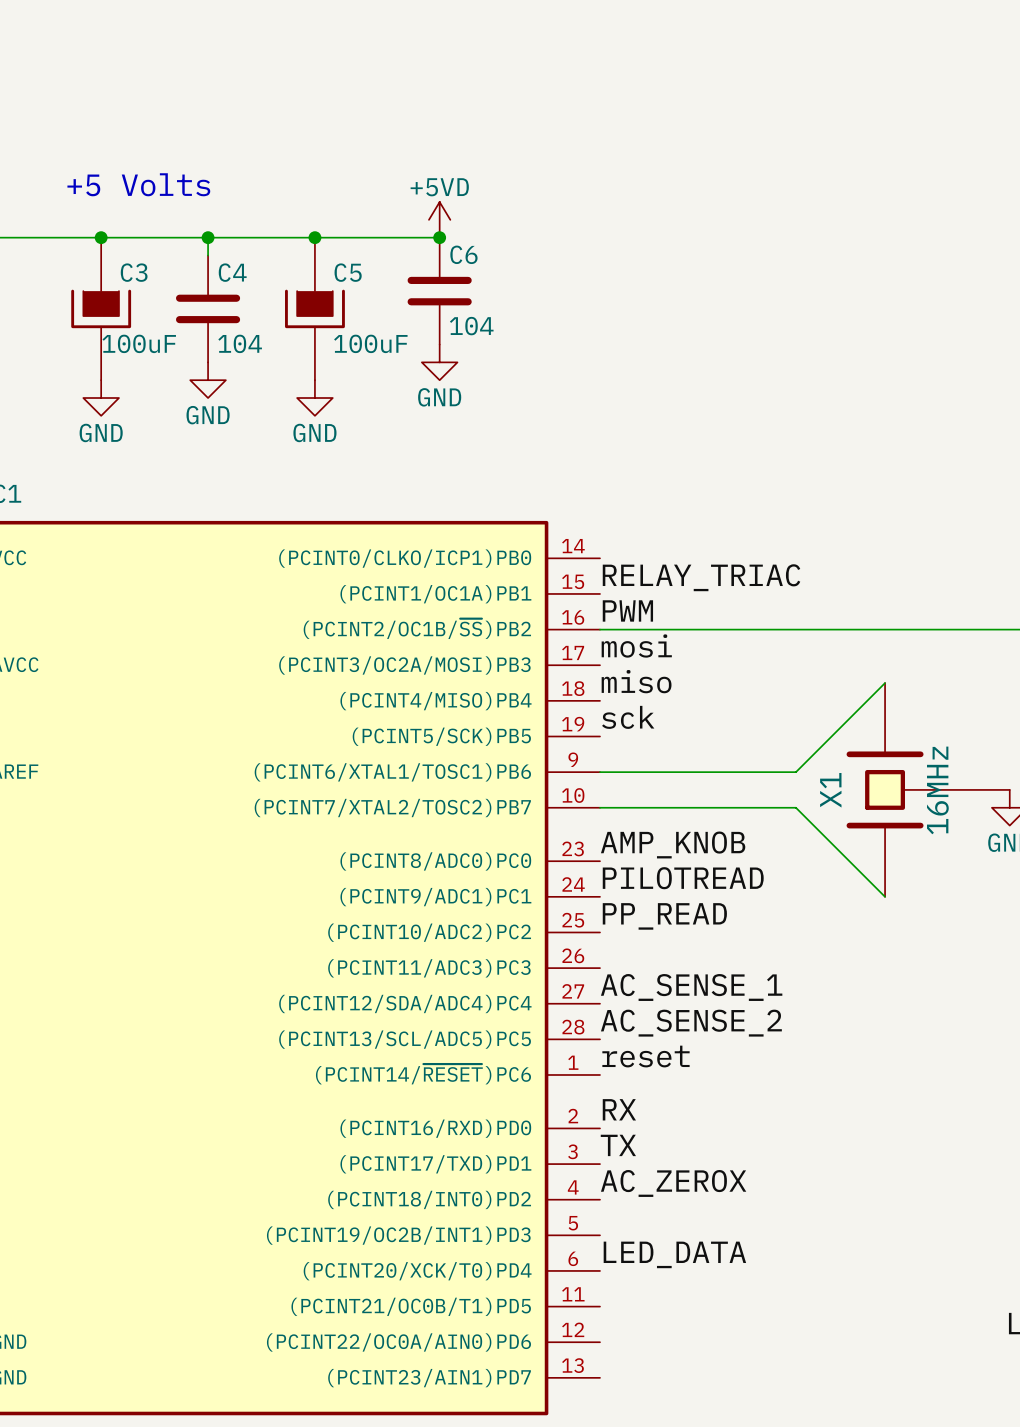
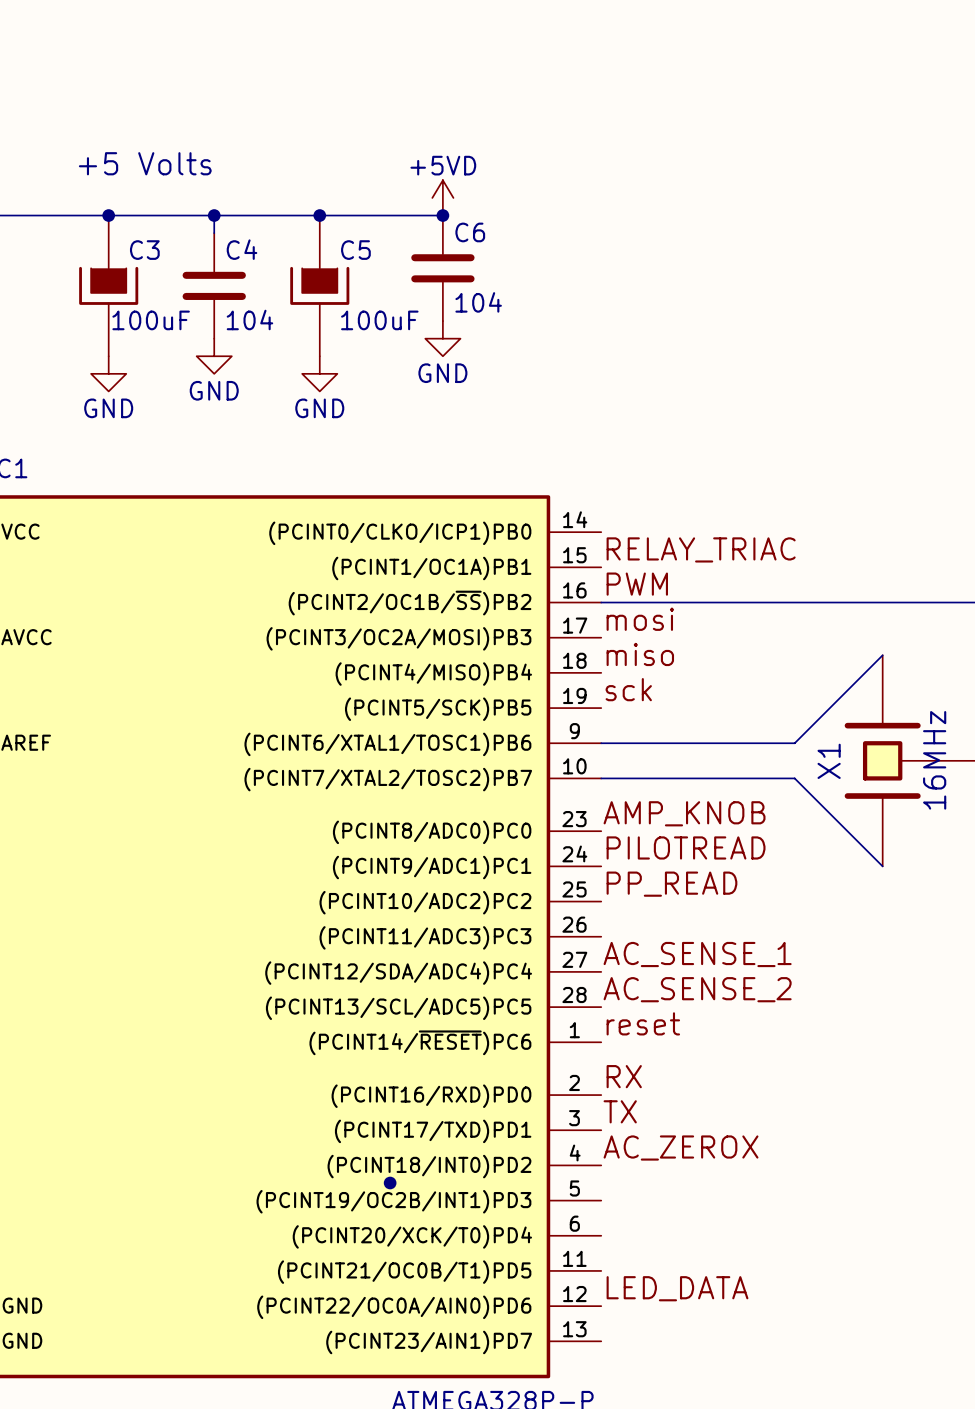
junction: none -> (390, 1183)
label position: LED_DATA (674, 1254) -> LED_DATA (677, 1288)

